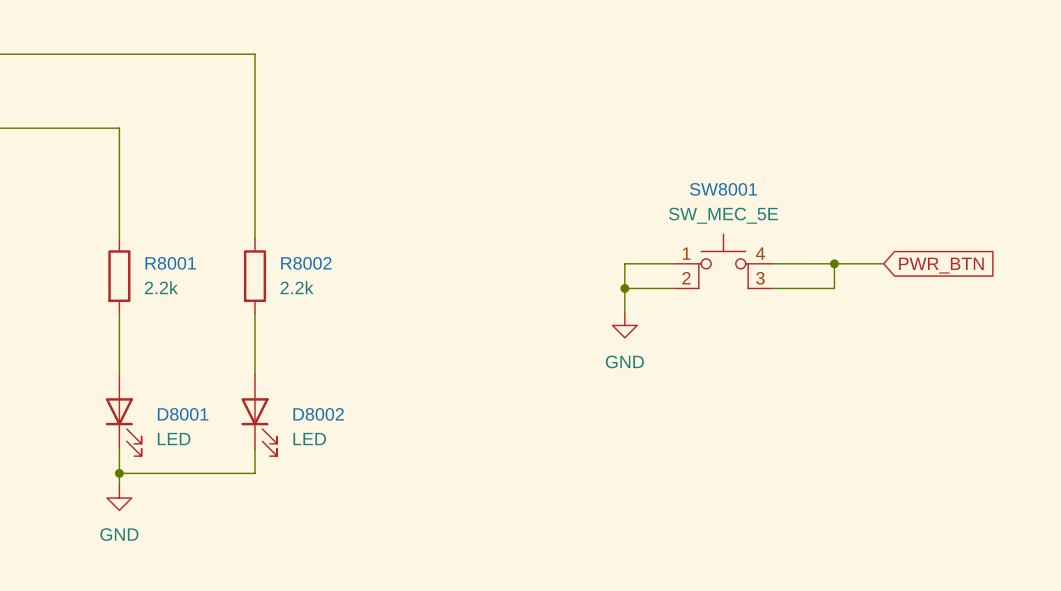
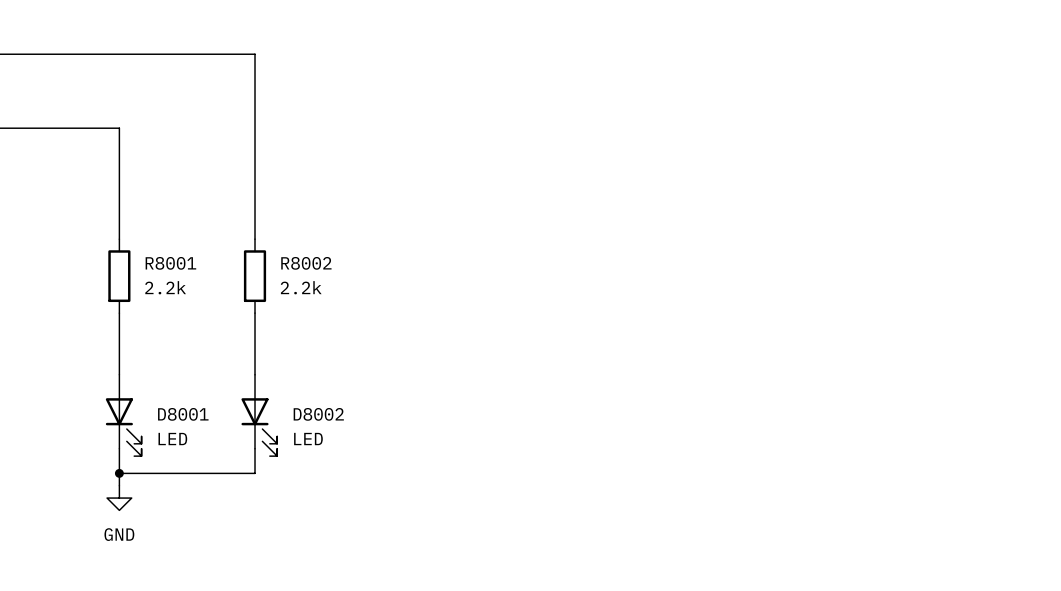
SW8001: SW_MEC_5E (723, 261) -> none
wire: (674, 263) (624, 263) (624, 313) -> none
wire: (772, 263) (883, 263) -> none
wire: (834, 263) (834, 288) (772, 288) -> none
junction: (834, 263) -> none
global label: PWR_BTN (941, 265) -> none
wire: (624, 288) (674, 288) -> none
junction: (624, 288) -> none
power symbol: GND (624, 325) -> none

